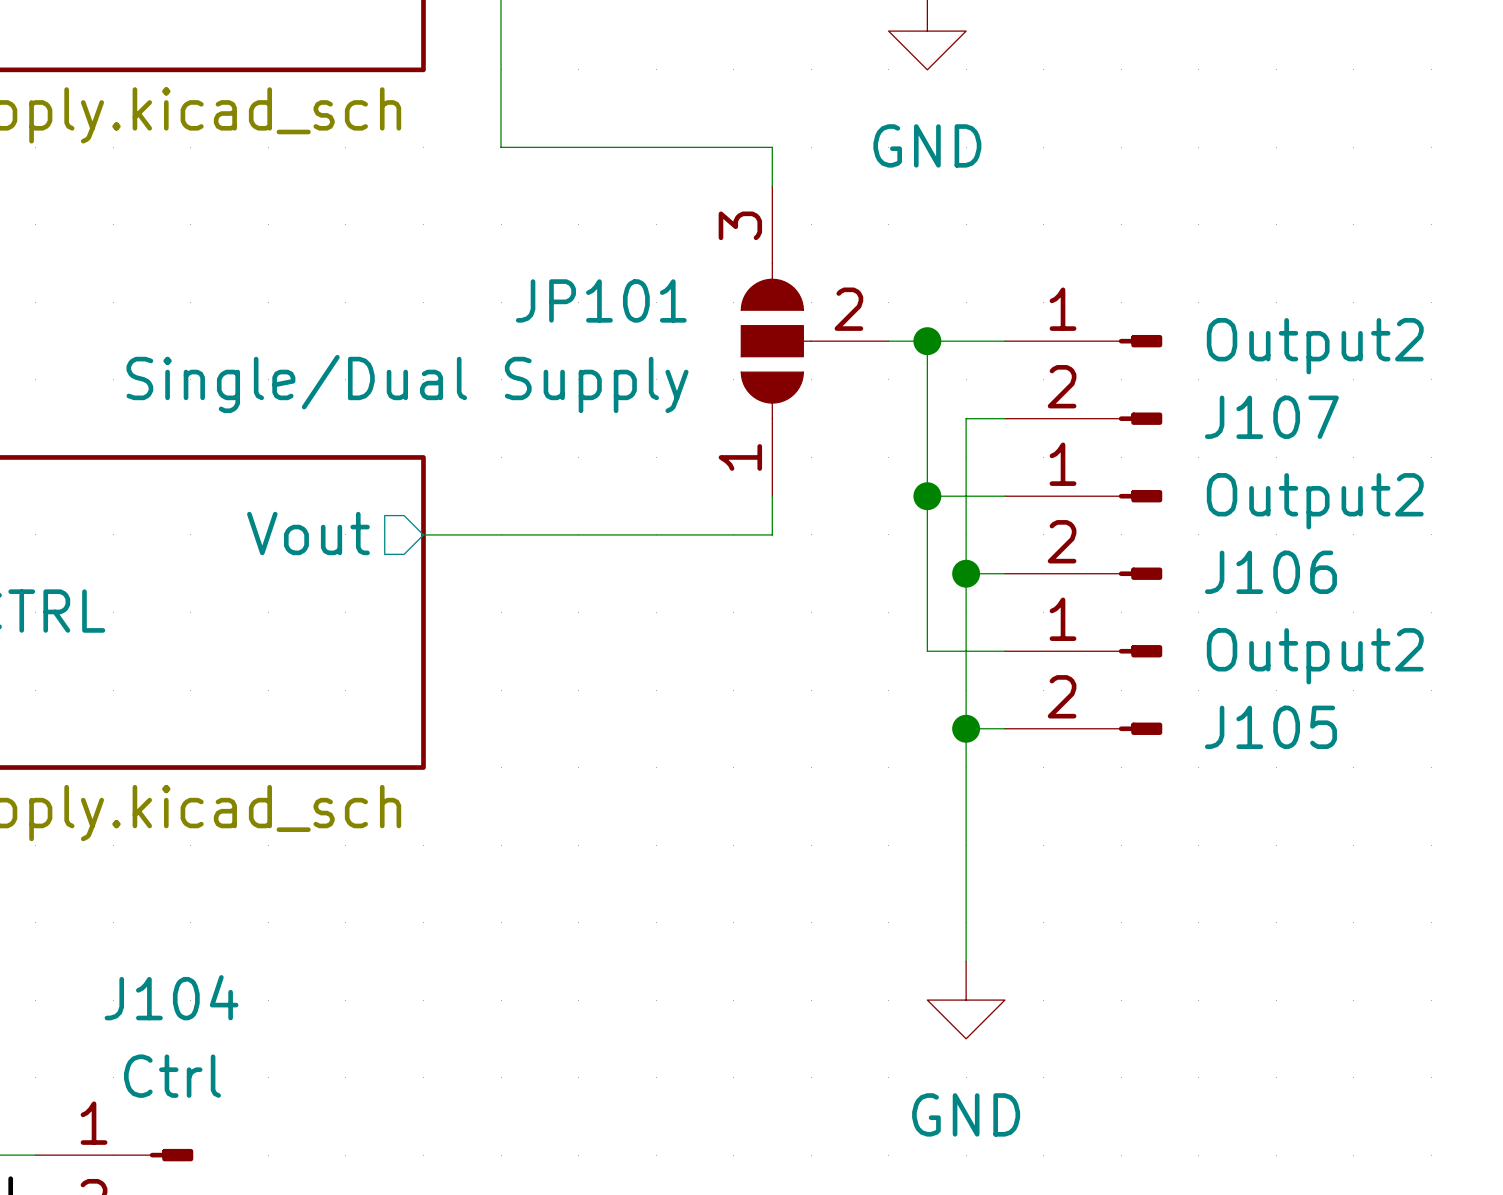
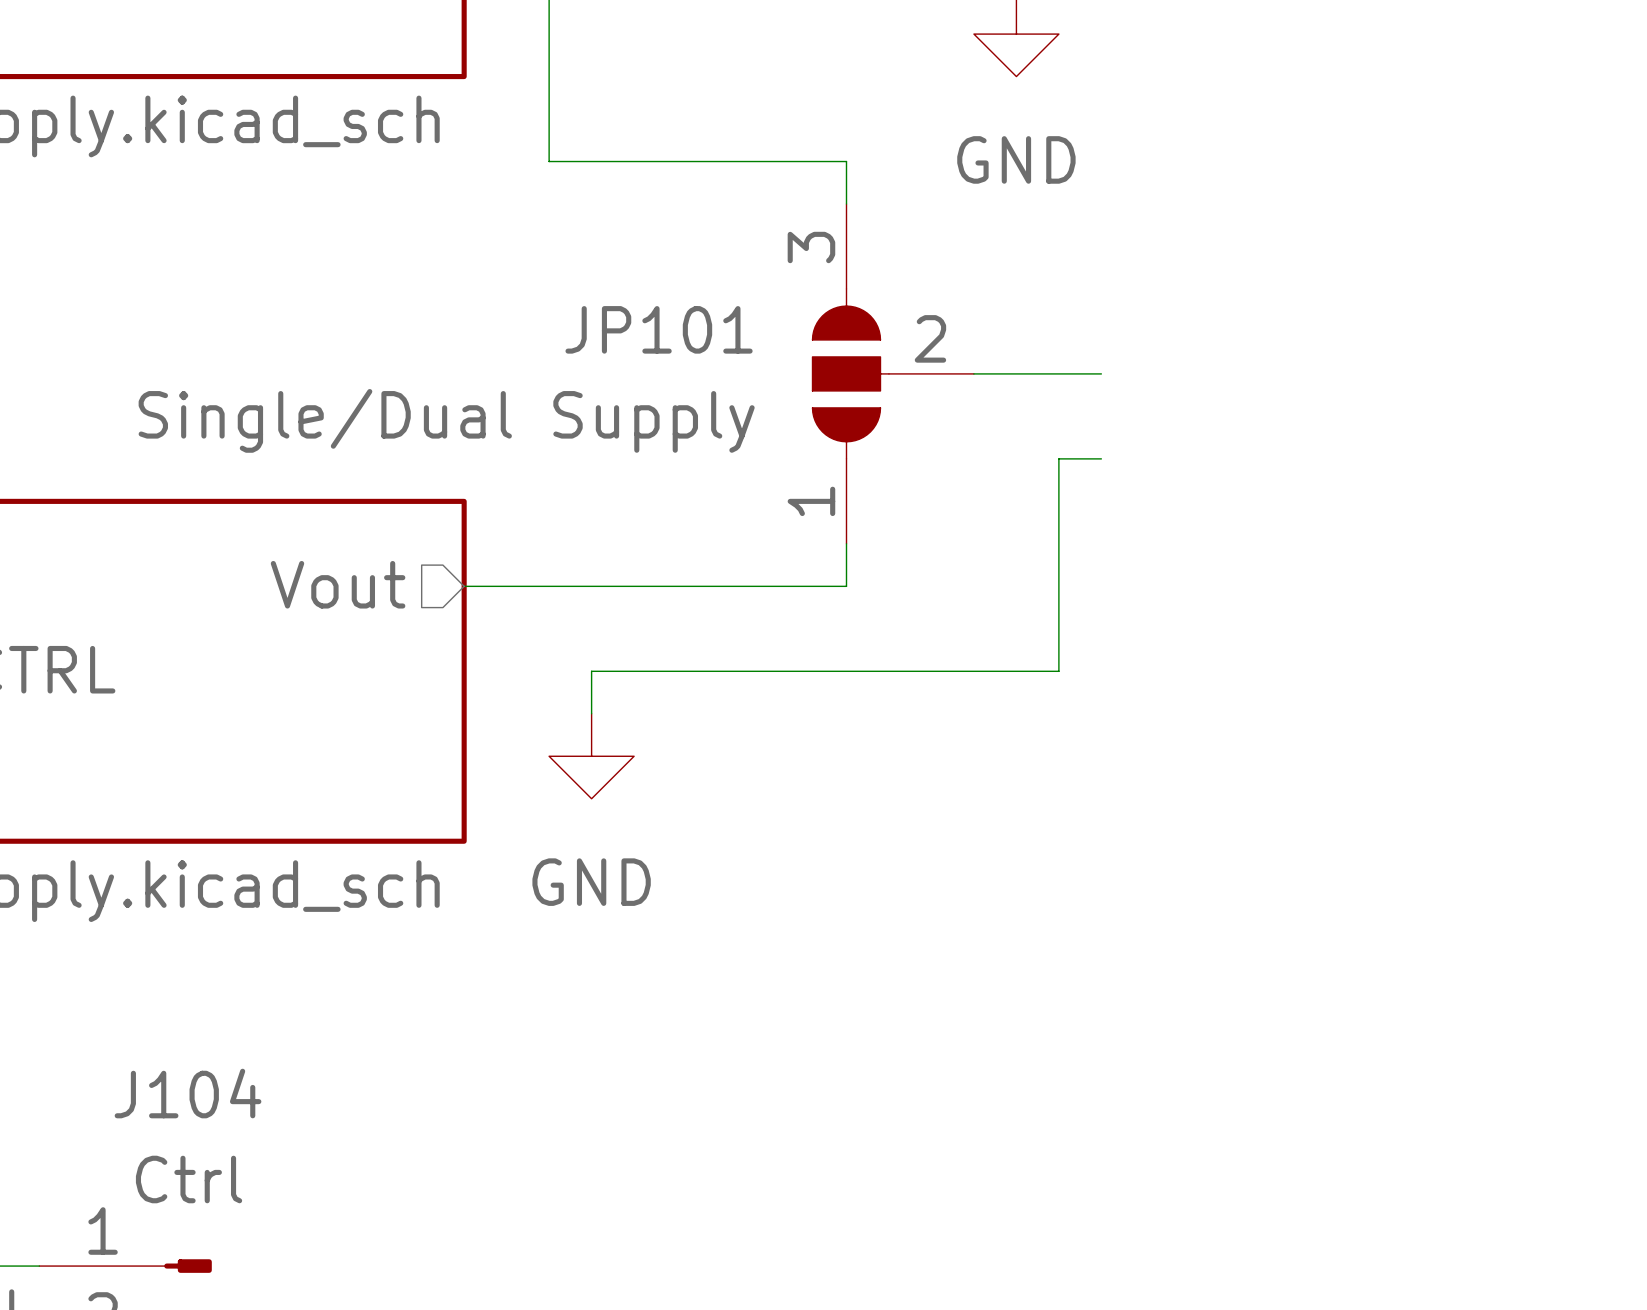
wire: (927, 341) (927, 651) (1004, 651) -> none
junction: (927, 341) -> none
J107: Output2 (1083, 379) -> none
wire: (927, 496) (1004, 496) -> none
junction: (927, 496) -> none
J106: Output2 (1083, 534) -> none
wire: (966, 573) (1004, 573) -> none
junction: (966, 573) -> none
wire: (966, 612) (966, 961) -> (1058, 671) (591, 671) (591, 713)
J105: Output2 (1083, 690) -> none
wire: (966, 728) (1004, 728) -> none
junction: (966, 728) -> none
power symbol position: GND (966, 1000) -> GND (591, 756)

